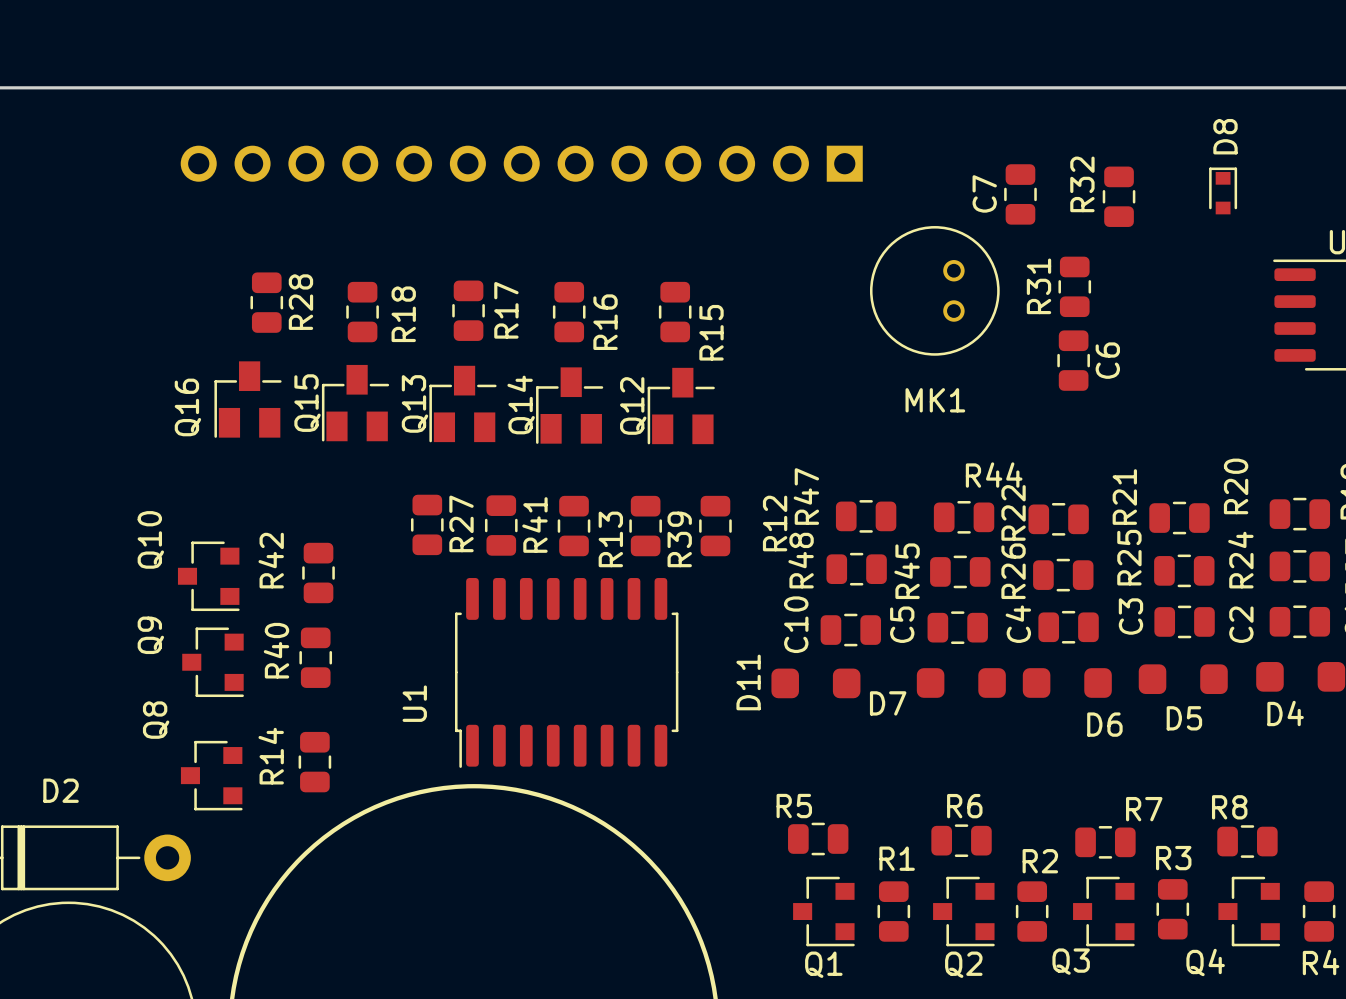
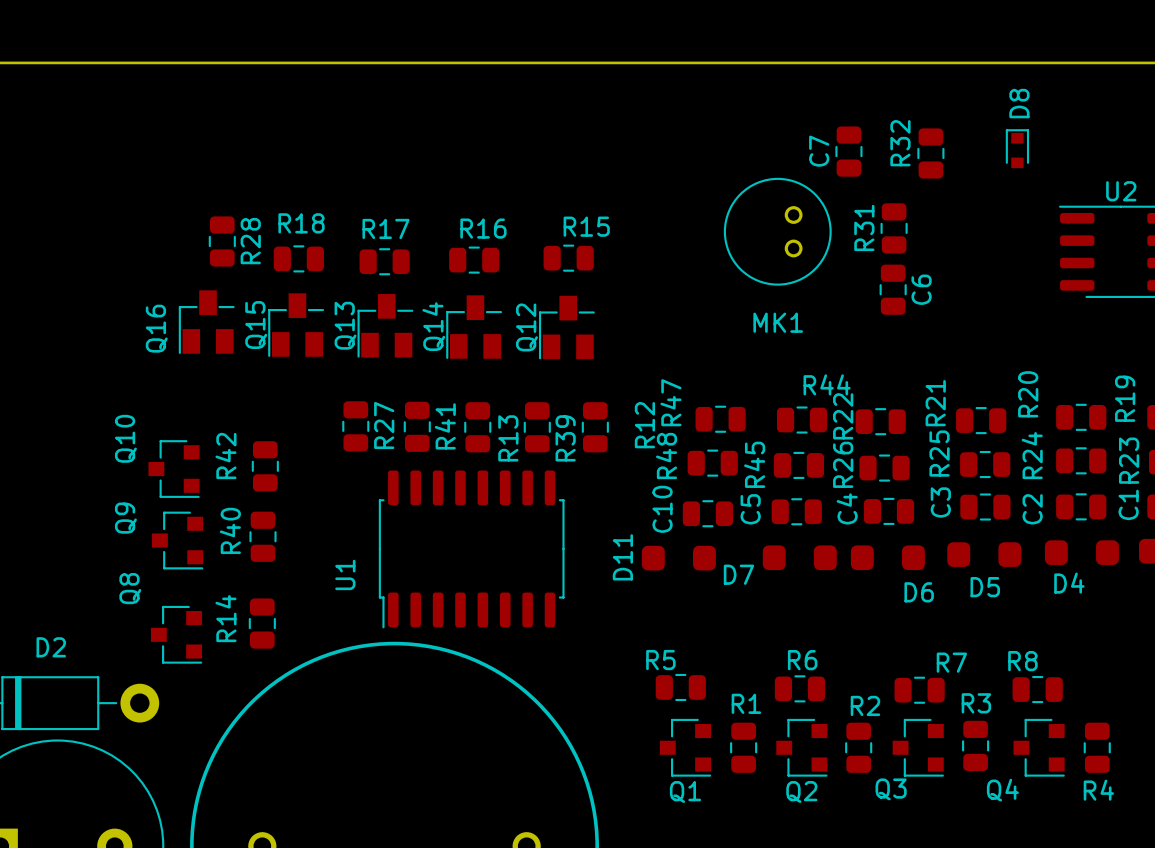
part: (521, 163) -> none
R17 rotation: 0° (468, 310) -> 90° clockwise (384, 261)
R17 name position: R17 (506, 310) -> R17 (385, 228)
R18 rotation: 0° (362, 312) -> 90° clockwise (298, 258)
R16 rotation: 0° (569, 312) -> 90° clockwise (474, 260)
R15 rotation: 0° (675, 312) -> 90° clockwise (568, 258)
R18 name position: R18 (403, 314) -> R18 (301, 223)
R16 name position: R16 (605, 322) -> R16 (483, 228)
R15 name position: R15 (711, 332) -> R15 (586, 226)

